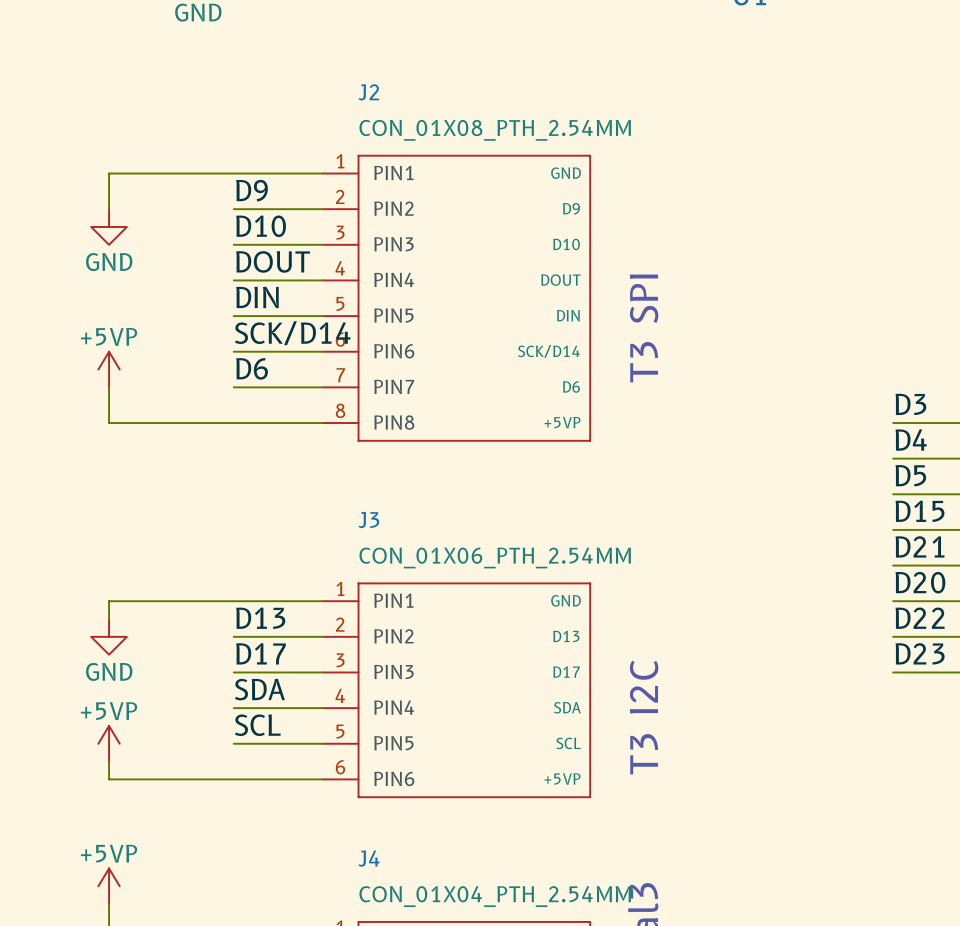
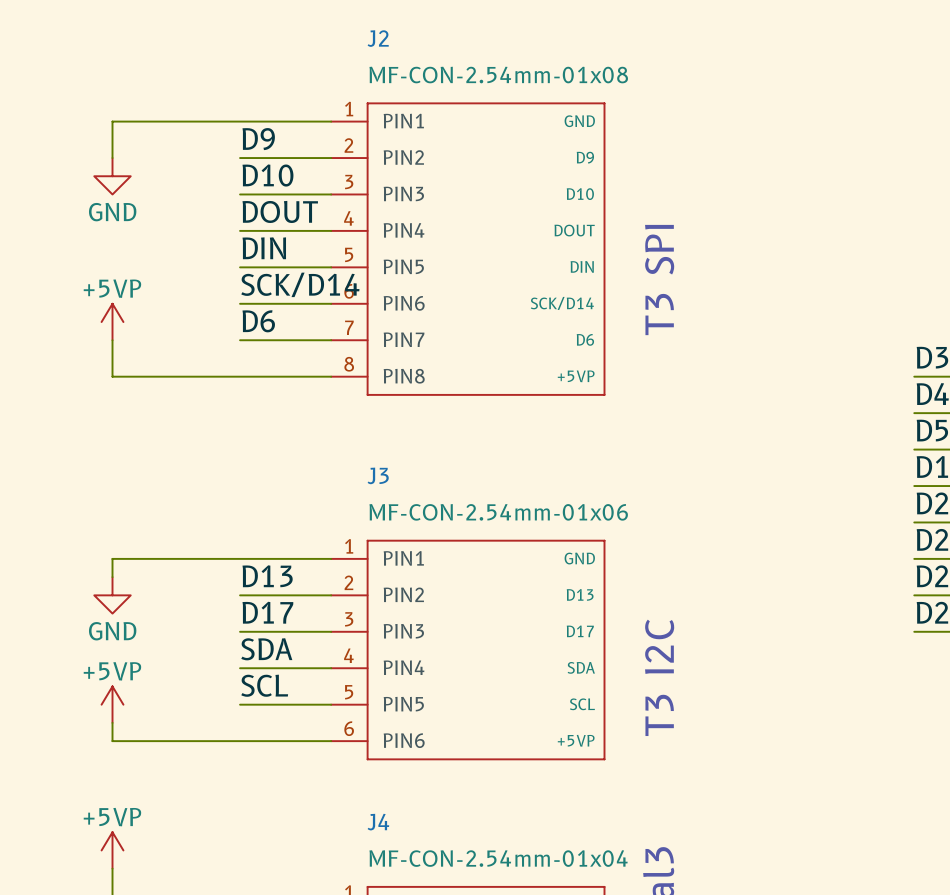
J2 value: CON_01X08_PTH_2.54MM (495, 130) -> MF-CON-2.54mm-01x08 (498, 75)
J3 value: CON_01X06_PTH_2.54MM (495, 557) -> MF-CON-2.54mm-01x06 (498, 512)
J4 value: CON_01X04_PTH_2.54MM (495, 896) -> MF-CON-2.54mm-01x04 (498, 858)

